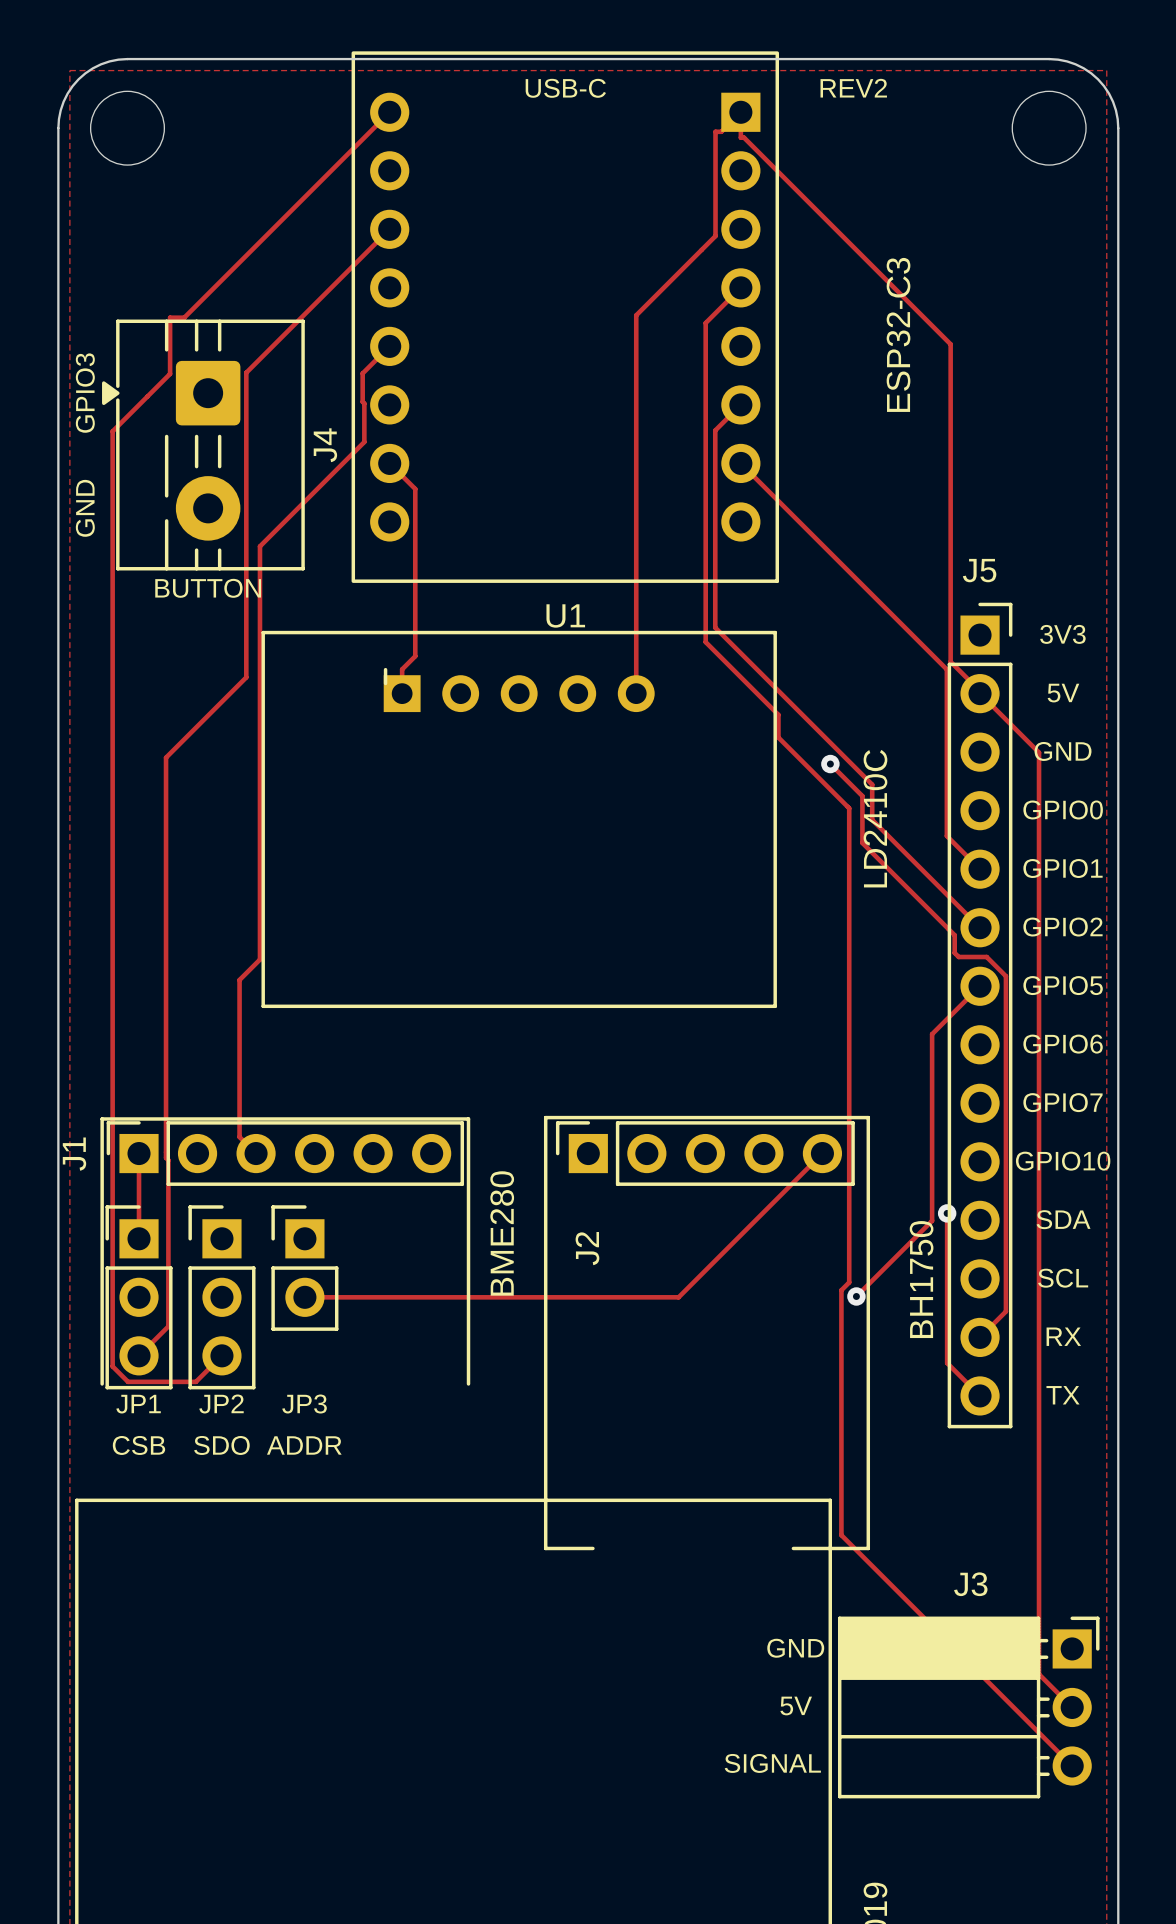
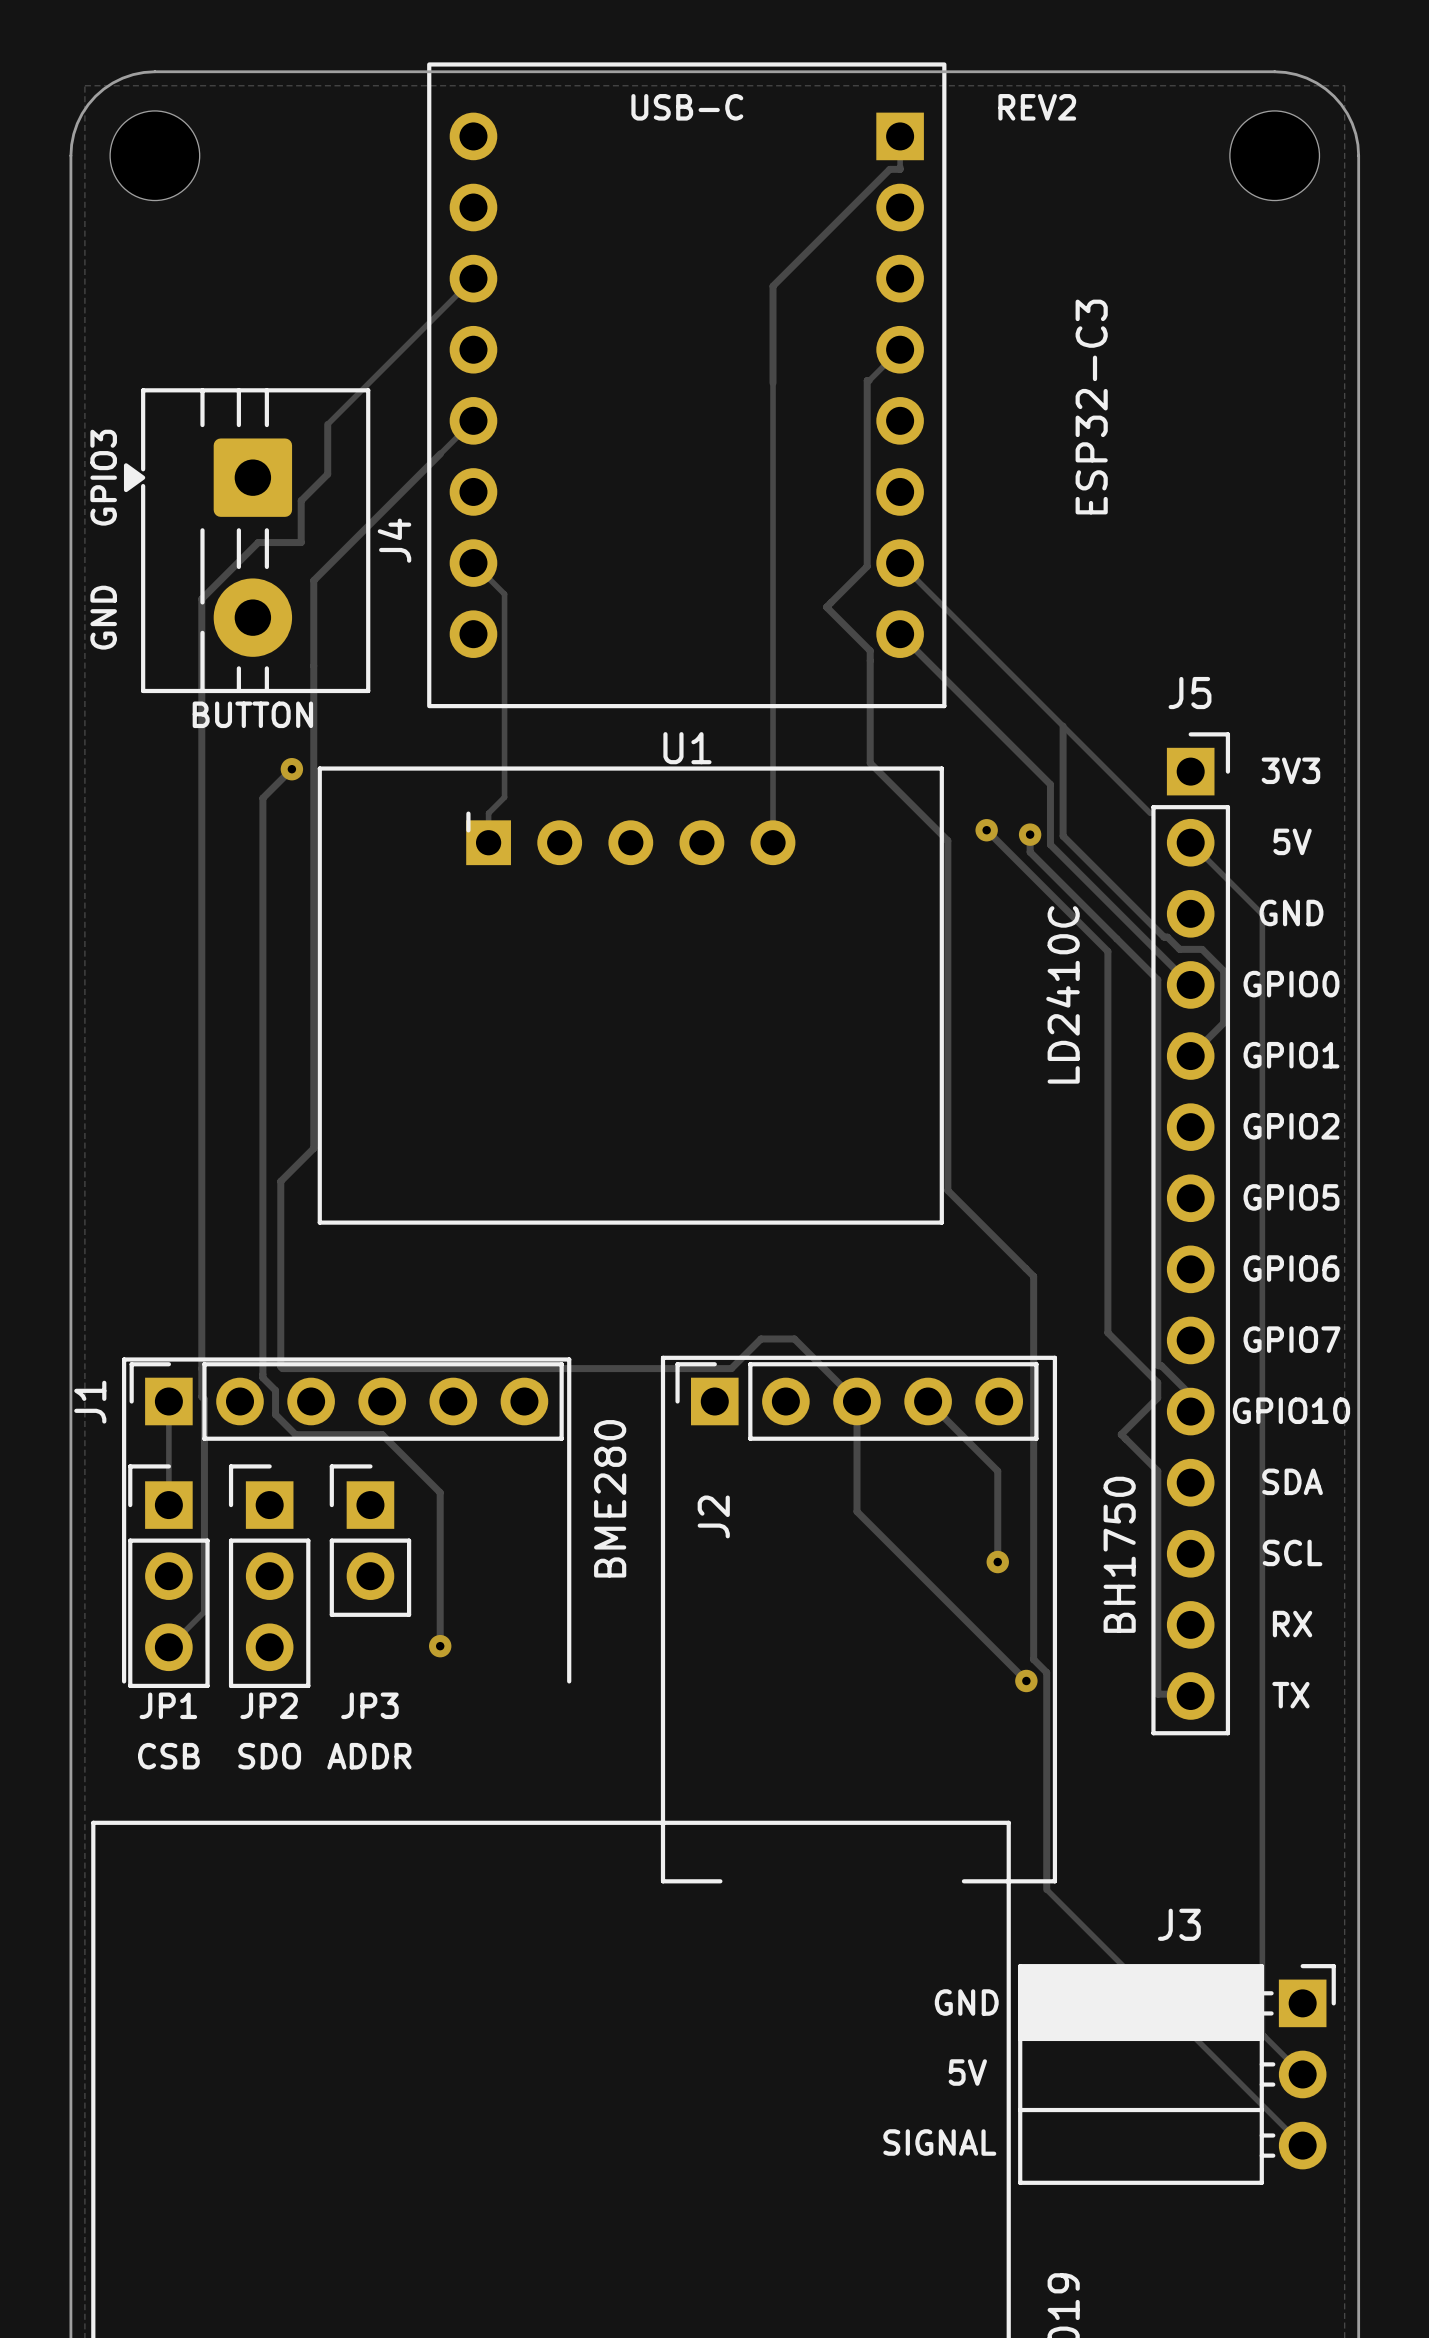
track: (389, 112) (184, 317) (170, 317) (170, 373) (112, 431) (112, 1366) (128, 1381) (195, 1381) (221, 1355) -> none
track: (740, 112) (721, 131) (715, 131) (715, 236) (636, 315) -> (900, 167) (900, 169) (889, 169) (773, 286) (773, 383)
track: (740, 137) (744, 137) (950, 344) (950, 661) (980, 691) (980, 693) -> none
track: (715, 313) (705, 323) (705, 642) (778, 714) (778, 737) (849, 808) (849, 1282) (841, 1290) (841, 1535) (861, 1555) -> (869, 380) (867, 380) (867, 566) (826, 607) (870, 650) (870, 763) (947, 840) (947, 1190) (1033, 1276) (1033, 1659) (1046, 1672) (1046, 1889)
track: (269, 349) (246, 372) (246, 677) (166, 757) (166, 1157) (168, 1160) (168, 1326) -> (327, 424) (327, 474) (301, 500) (301, 542) (258, 542) (201, 598) (201, 1396) (204, 1399) (204, 1611)
track: (362, 373) (364, 442) (259, 546) (259, 959) (239, 980) (239, 1137) (256, 1153) -> (440, 453) (313, 580) (313, 1148) (280, 1181) (280, 1366) (282, 1368) (731, 1368) (760, 1338) (794, 1338) (857, 1401) (857, 1511) (1026, 1680)
track: (740, 404) (715, 430) (715, 627) (872, 784) (872, 819) (980, 927) -> none
track: none -> (900, 634) (1050, 784) (1050, 844) (1190, 984)
track: none -> (291, 769) (262, 798) (262, 1377) (275, 1390) (275, 1414) (295, 1434) (382, 1434) (440, 1492) (440, 1646)
via: none -> (291, 769)
track: (946, 669) (946, 836) (980, 869) -> (1063, 726) (1063, 836) (1164, 937) (1167, 937) (1179, 949) (1202, 949) (1223, 970) (1223, 1023) (1190, 1056)
via: none -> (986, 830)
track: none -> (1030, 834) (1030, 852) (1157, 979) (1157, 1364) (1161, 1365) (1190, 1395) (1190, 1411)
via: none -> (1030, 834)
track: (830, 764) (862, 796) (862, 842) (954, 935) (954, 952) (958, 956) (986, 956) (1005, 976) (1005, 1311) (980, 1337) -> none
via: (830, 764) -> none
track: (980, 986) (932, 1034) (932, 1220) (856, 1296) -> none
track: none -> (928, 1401) (997, 1471) (997, 1562)
track: (822, 1153) (678, 1297) (304, 1297) -> none
track: (947, 1213) (947, 1363) (978, 1394) -> (986, 830) (1107, 951) (1107, 1332) (1157, 1382) (1157, 1398) (1121, 1434) (1157, 1471) (1157, 1694) (1188, 1694)
via: (947, 1213) -> none
via position: (856, 1296) -> (997, 1562)
via: none -> (440, 1646)
via: none -> (1026, 1680)

